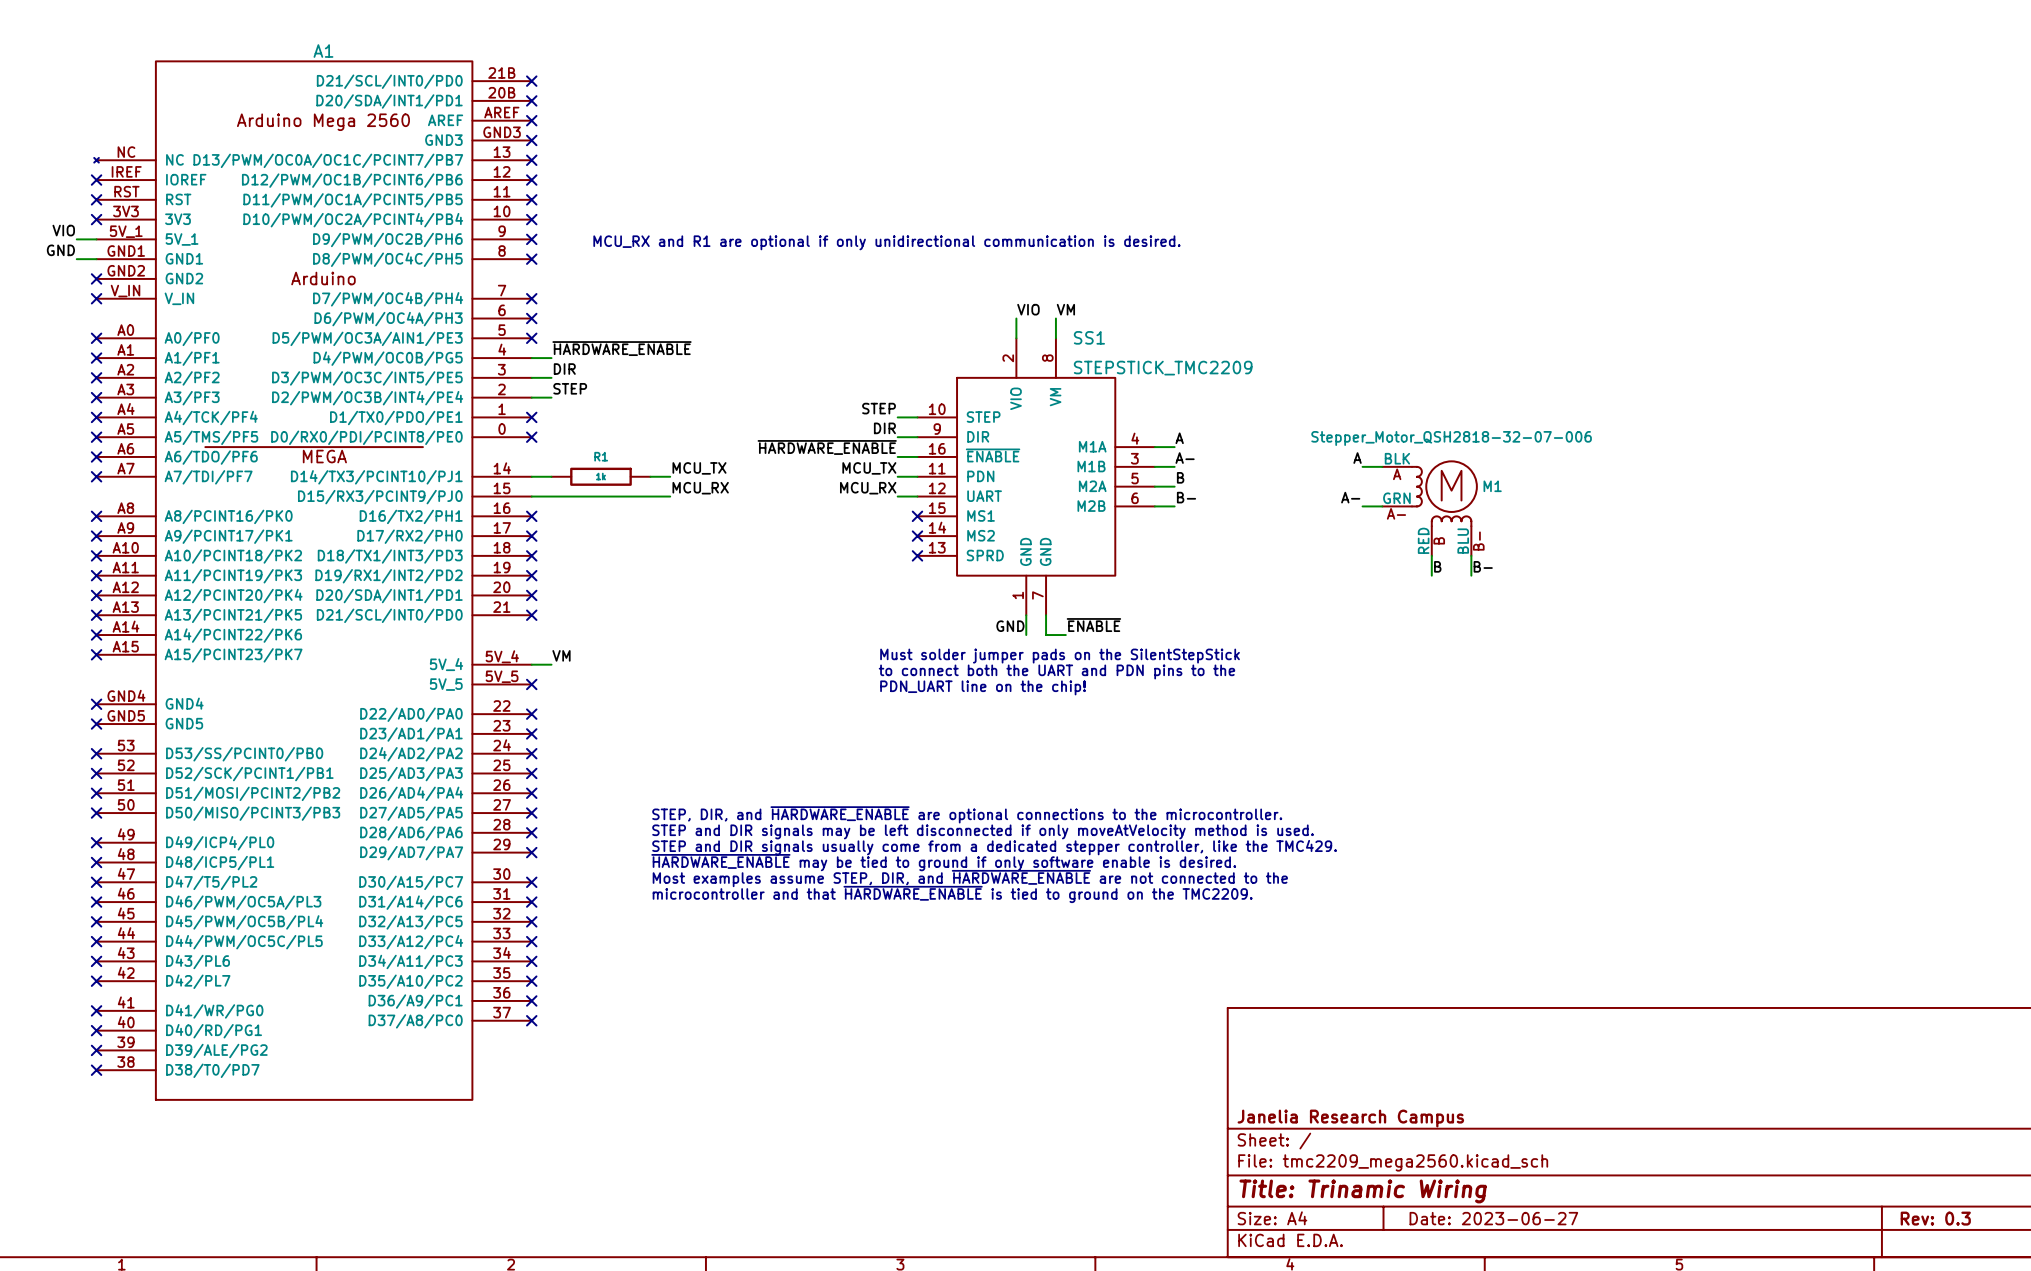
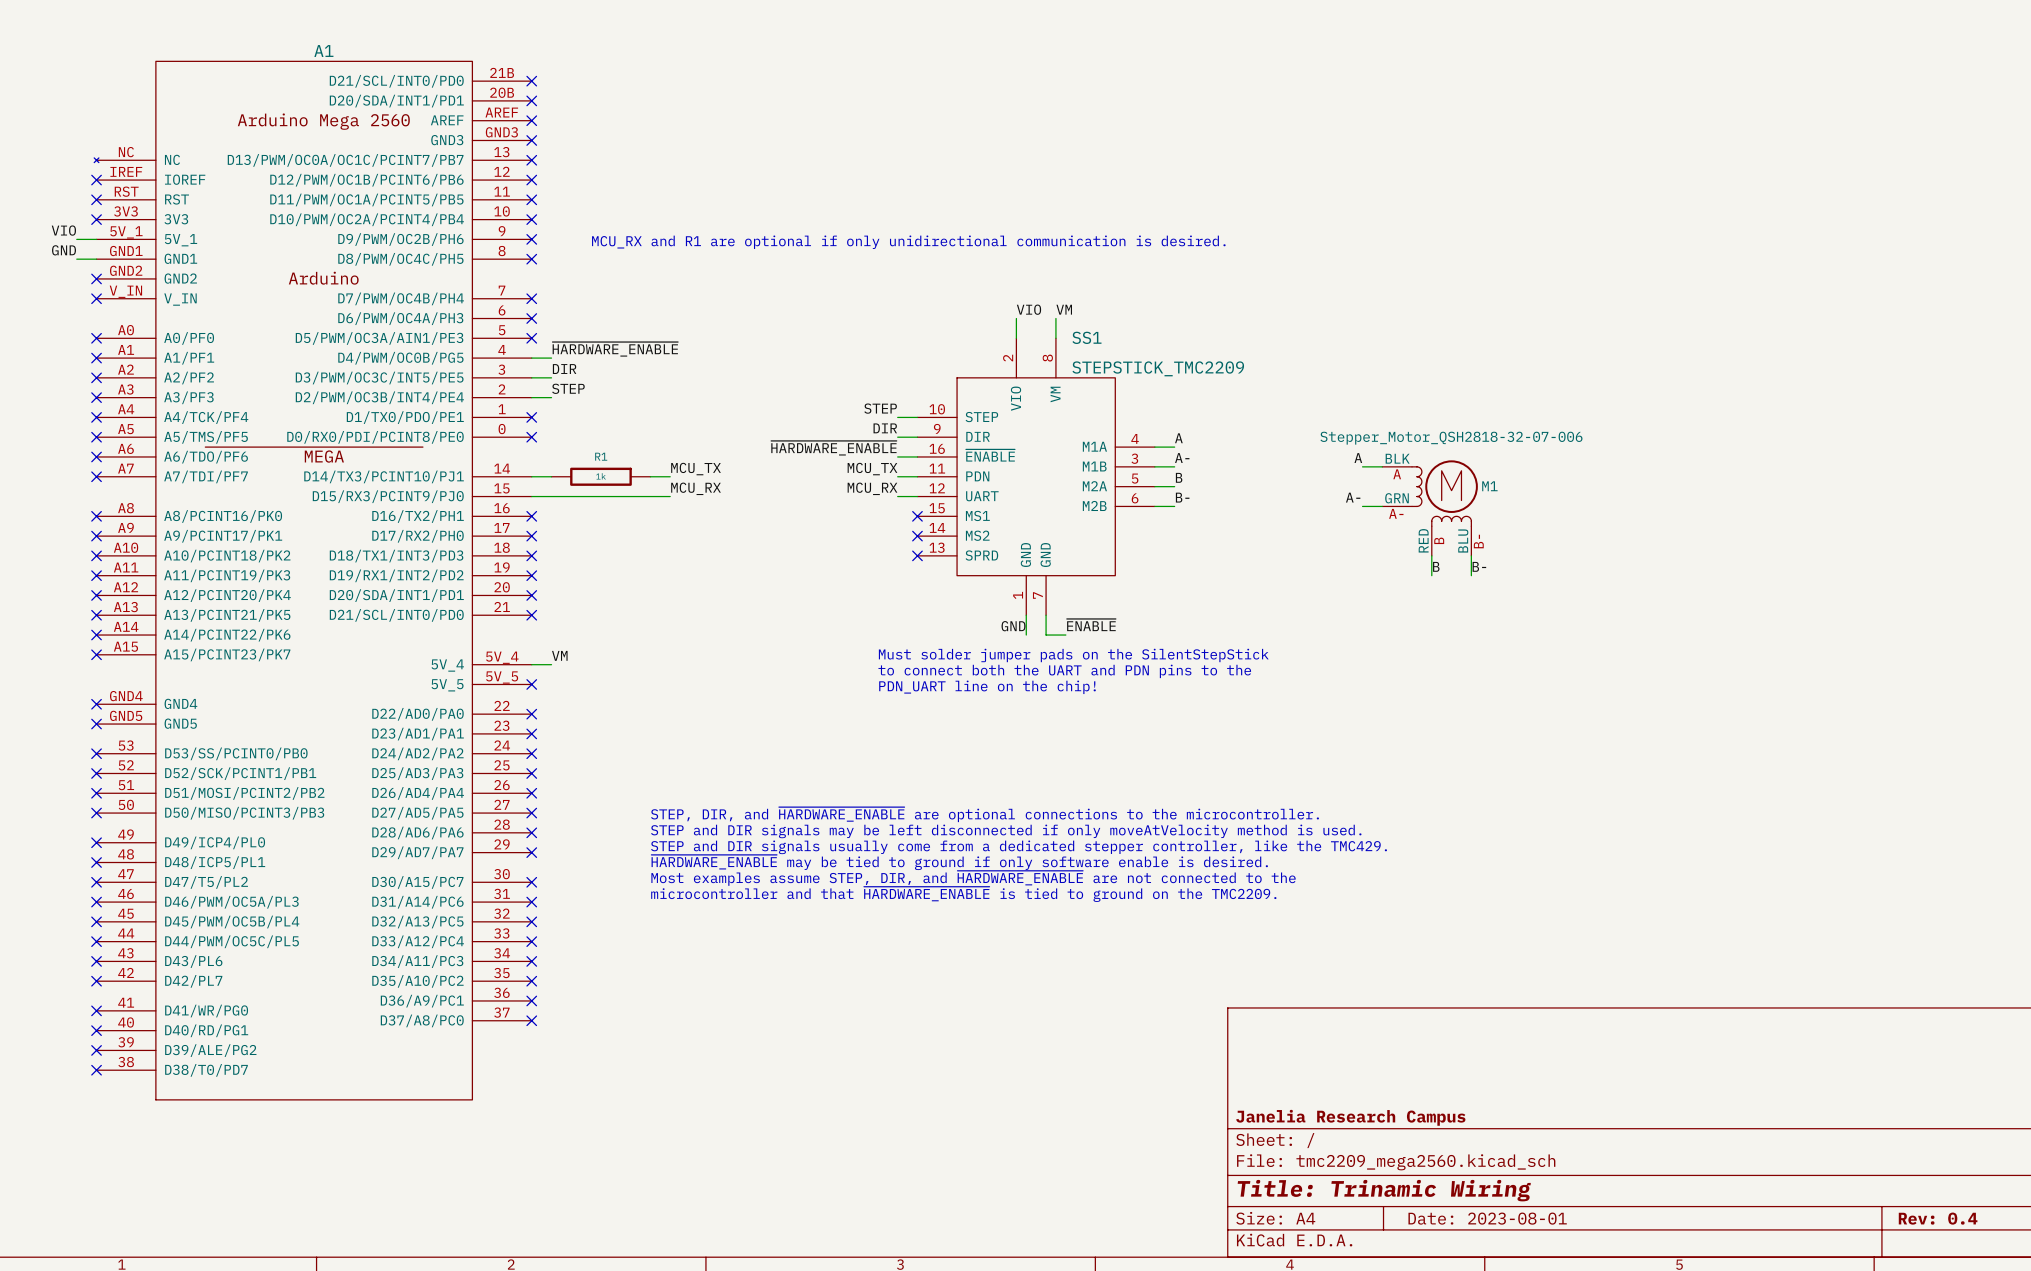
title block: Date: 2023-06-27 (1493, 1218) -> Date: 2023-08-01 (1487, 1218)
title block: Rev: 0.3 (1935, 1218) -> Rev: 0.4 (1938, 1218)

